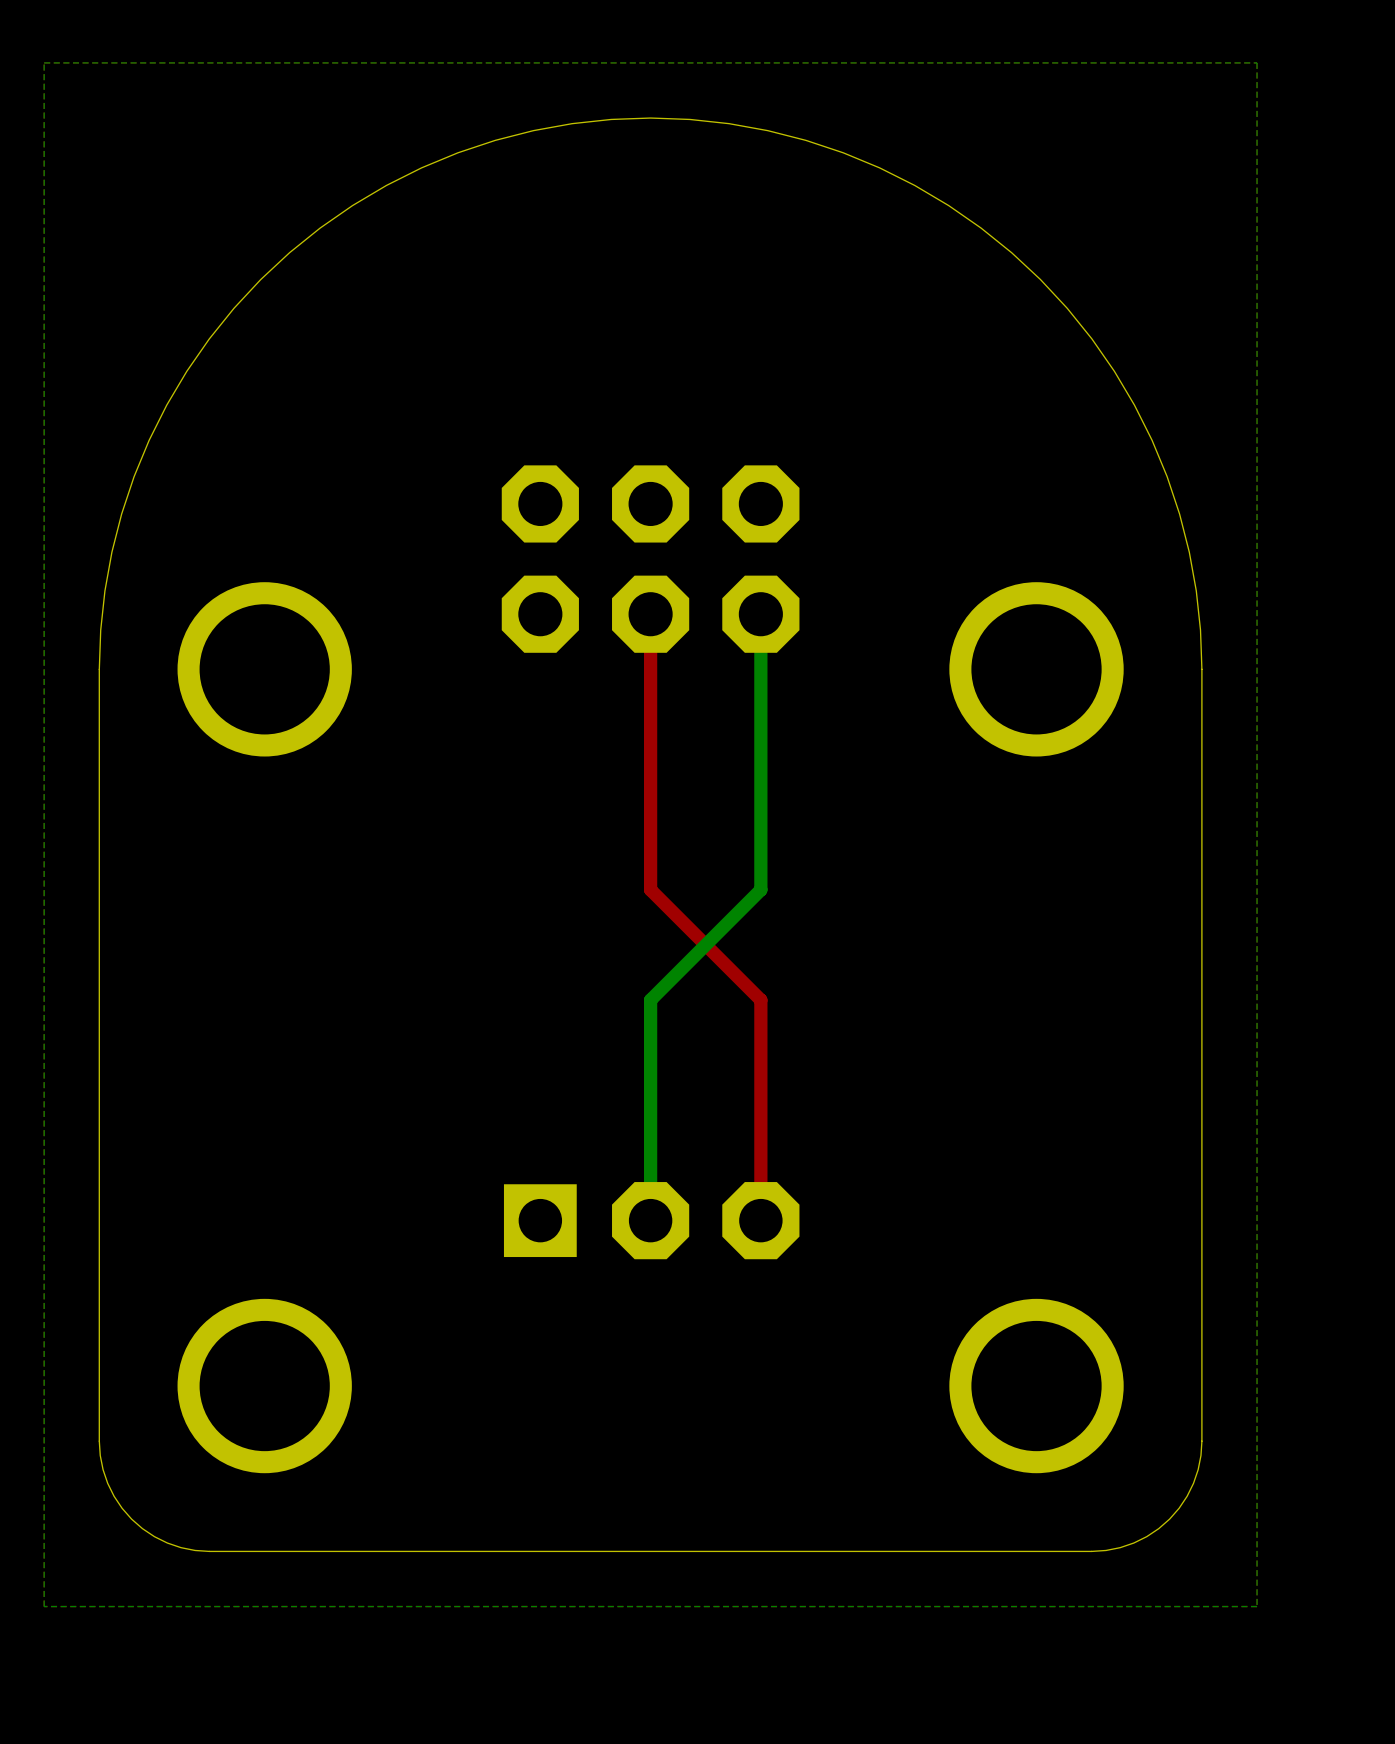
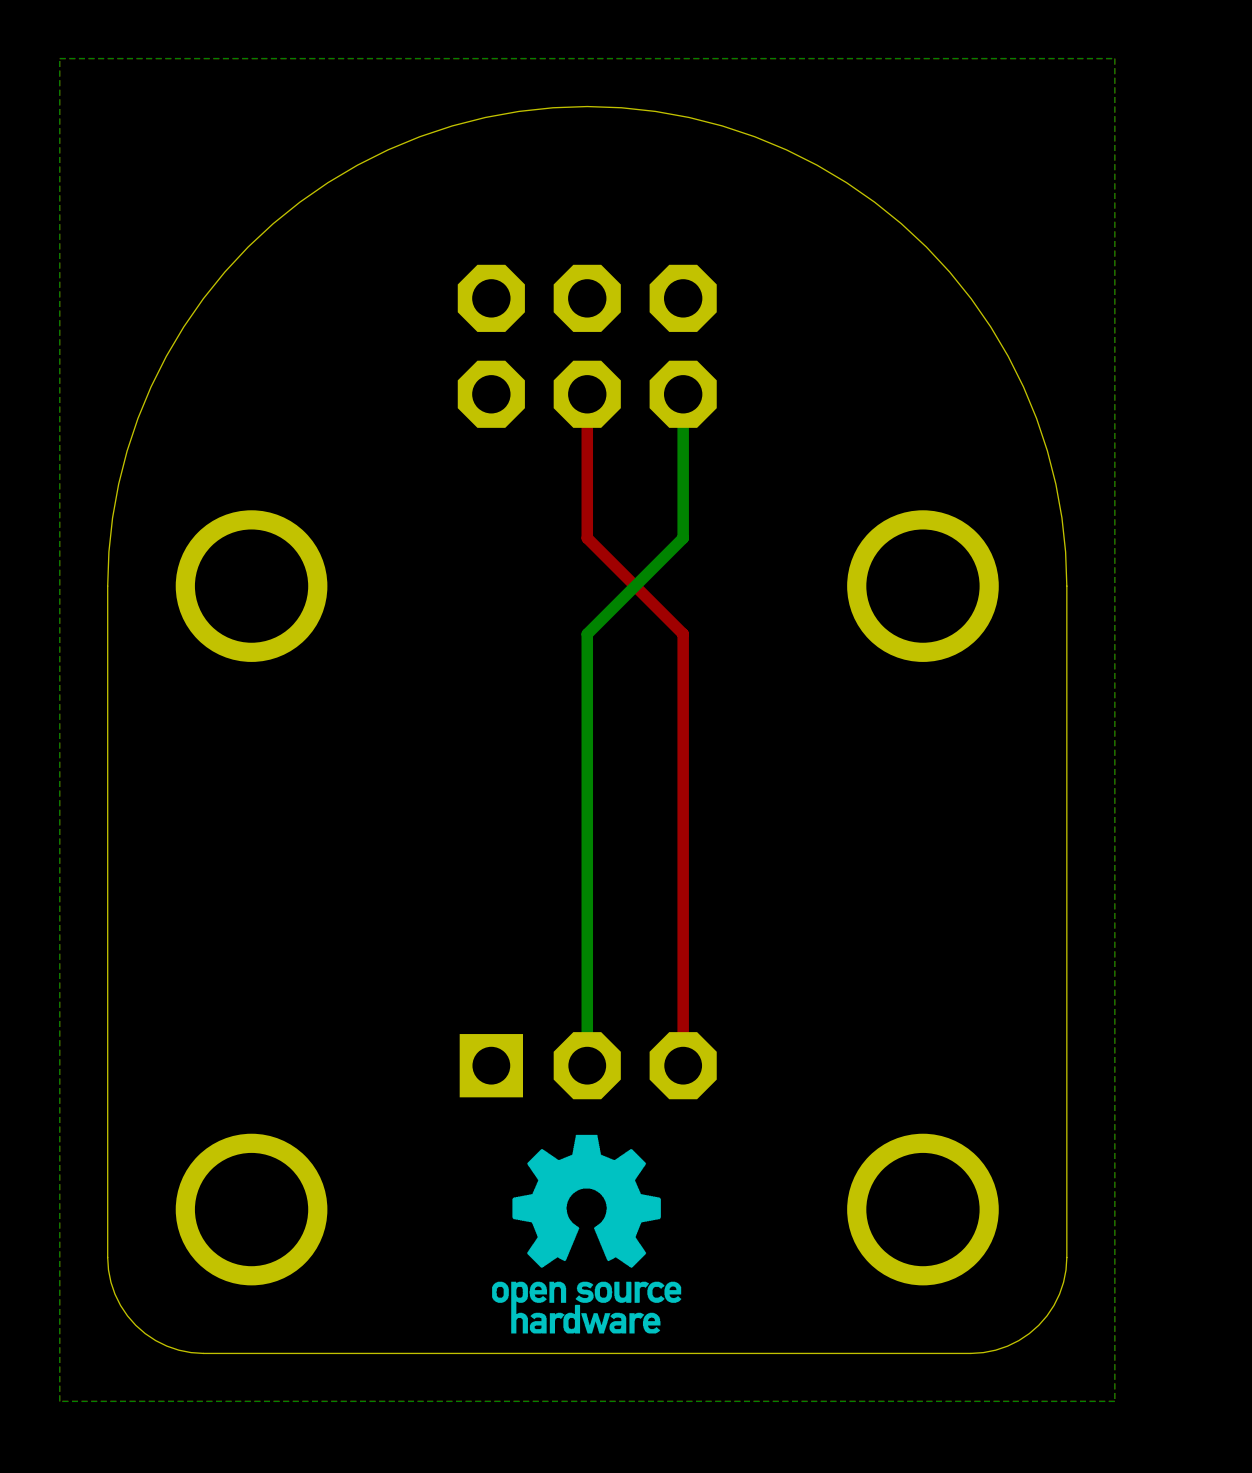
part position: (650, 559) -> (587, 346)
top track: (650, 614) (650, 889) (760, 1000) -> (587, 394) (587, 538) (683, 634) (683, 873)
bottom track: (760, 614) (760, 889) (650, 1000) -> (683, 394) (683, 538) (587, 634) (587, 873)
drawing: none -> [492, 1134, 682, 1334]

